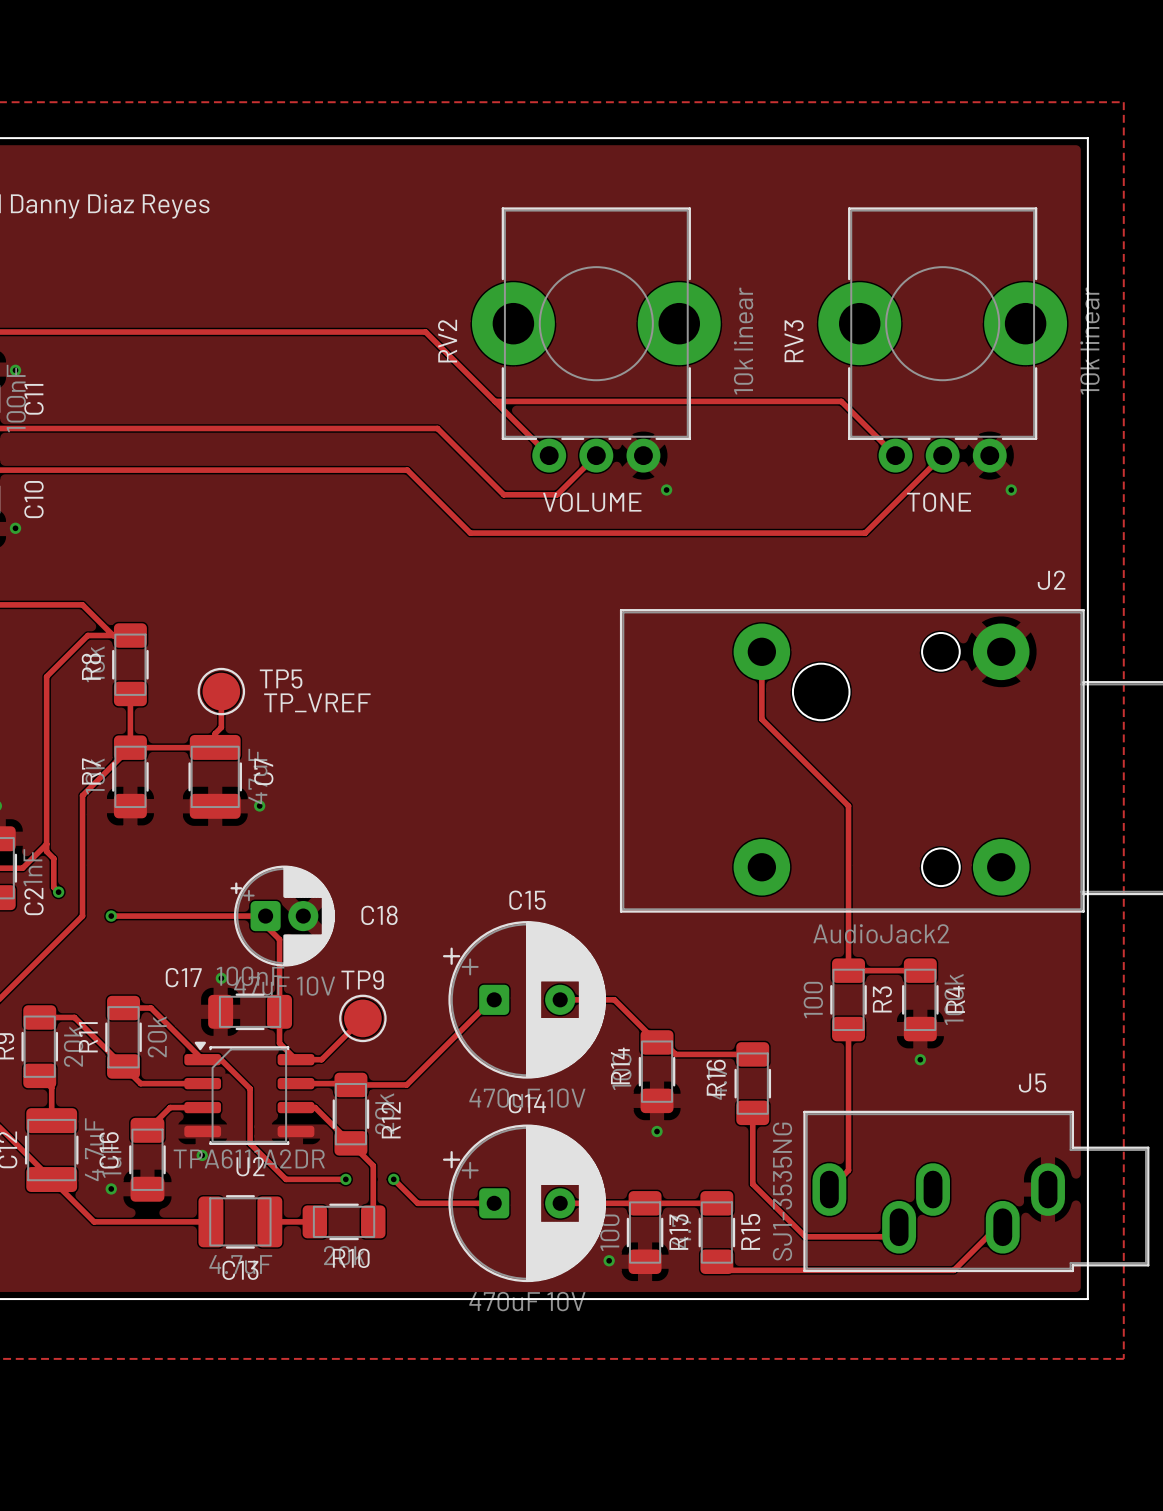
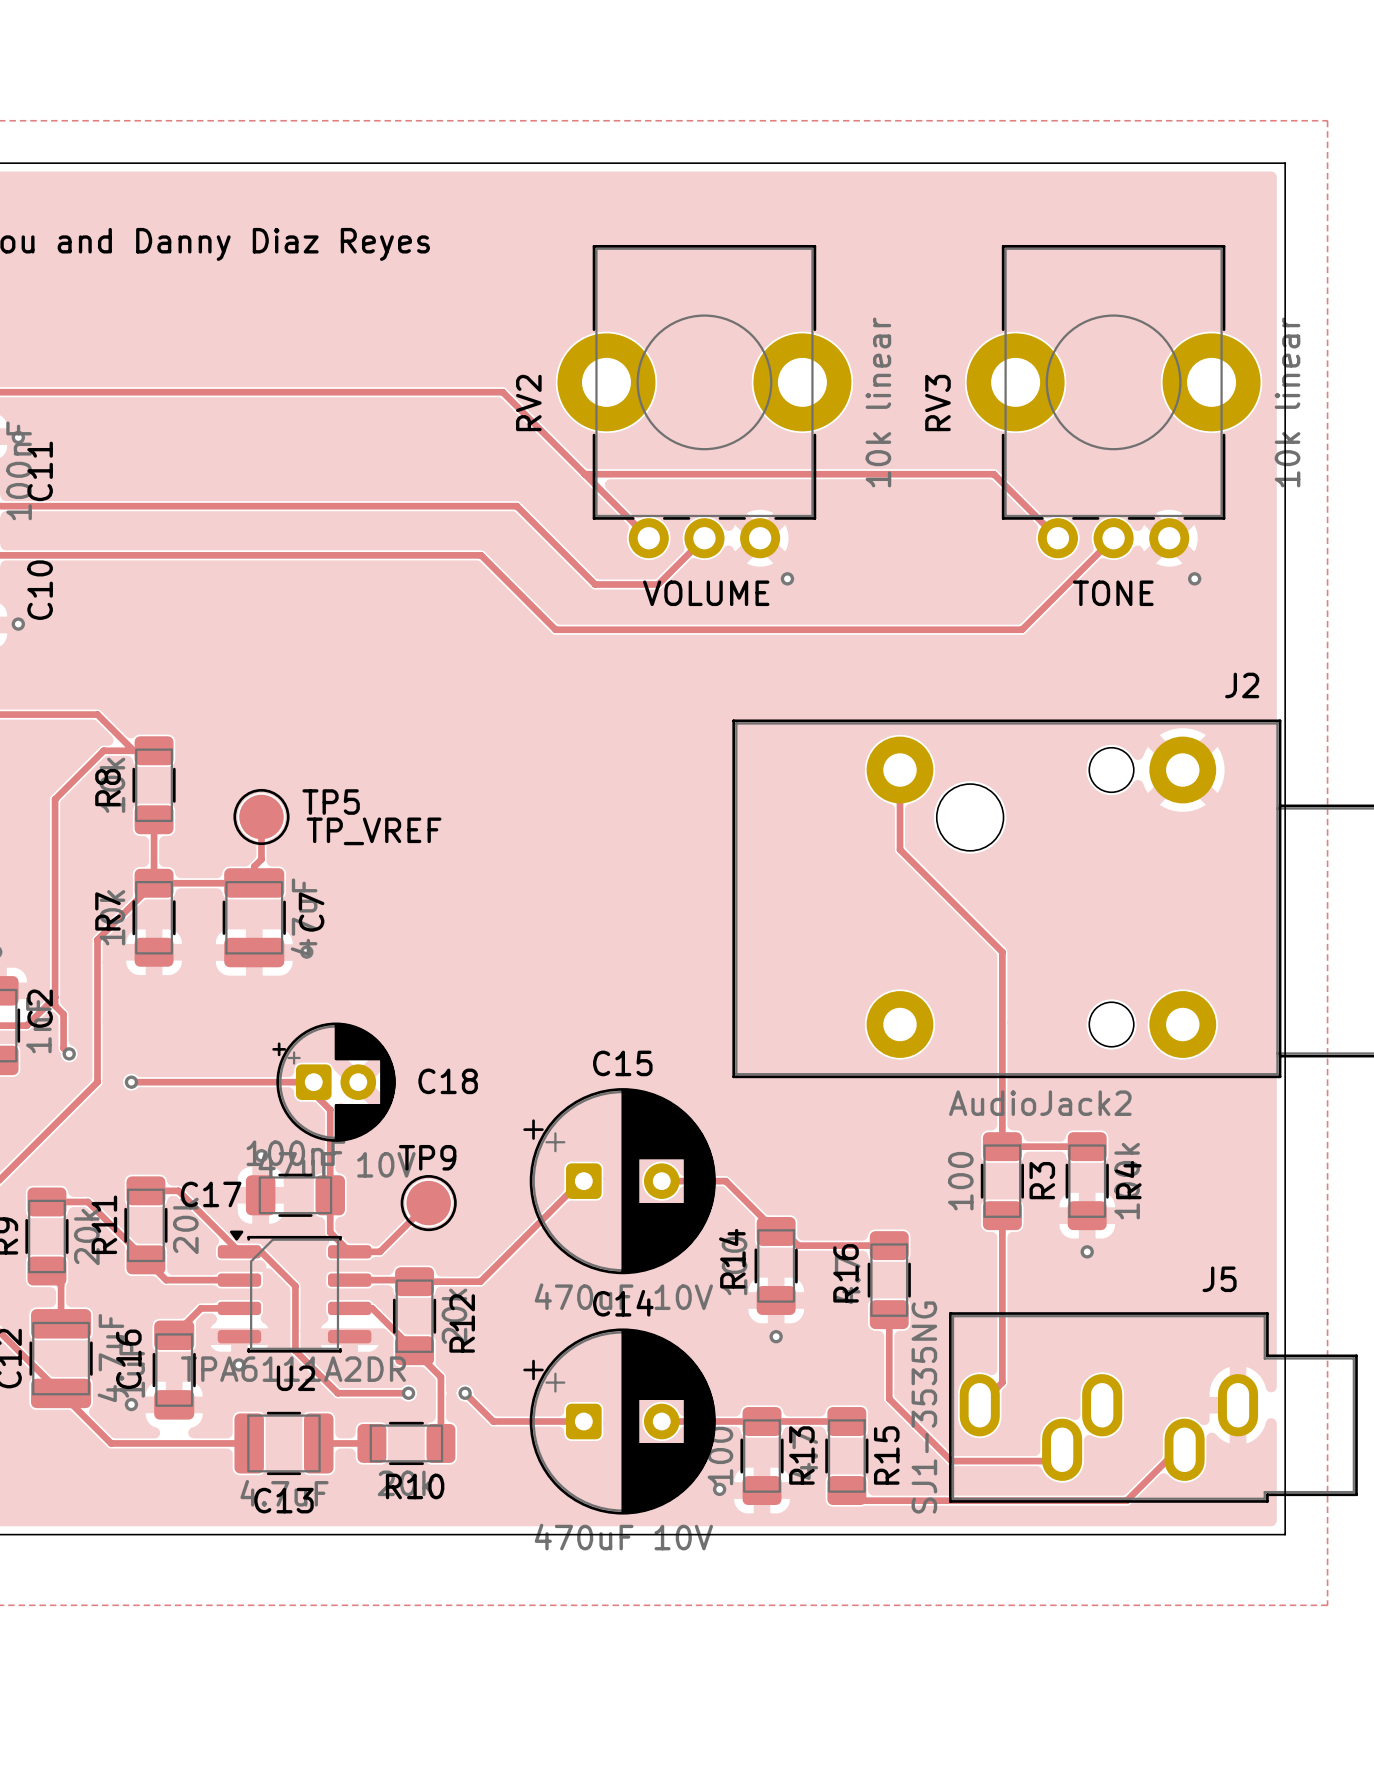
C2 name position: C2 (33, 901) -> C2 (40, 1008)
C17 name position: C17 (183, 977) -> C17 (211, 1194)

